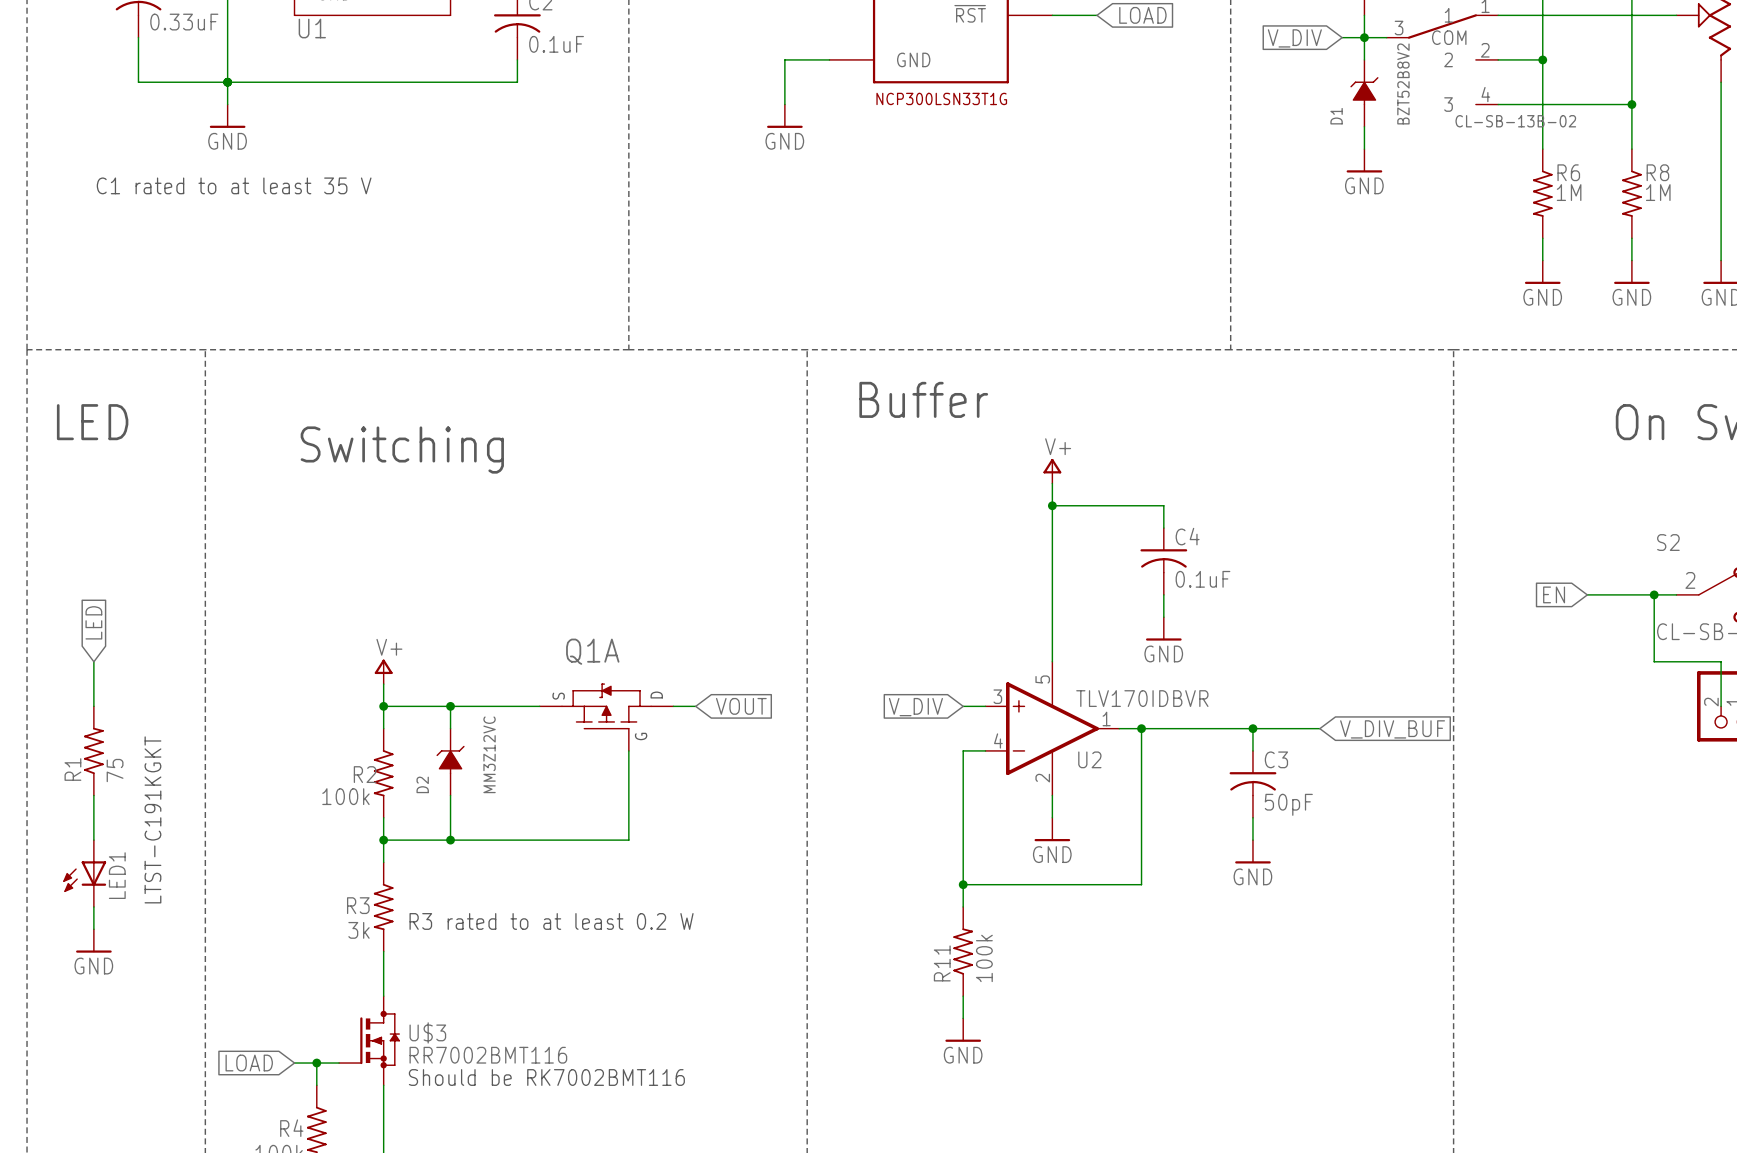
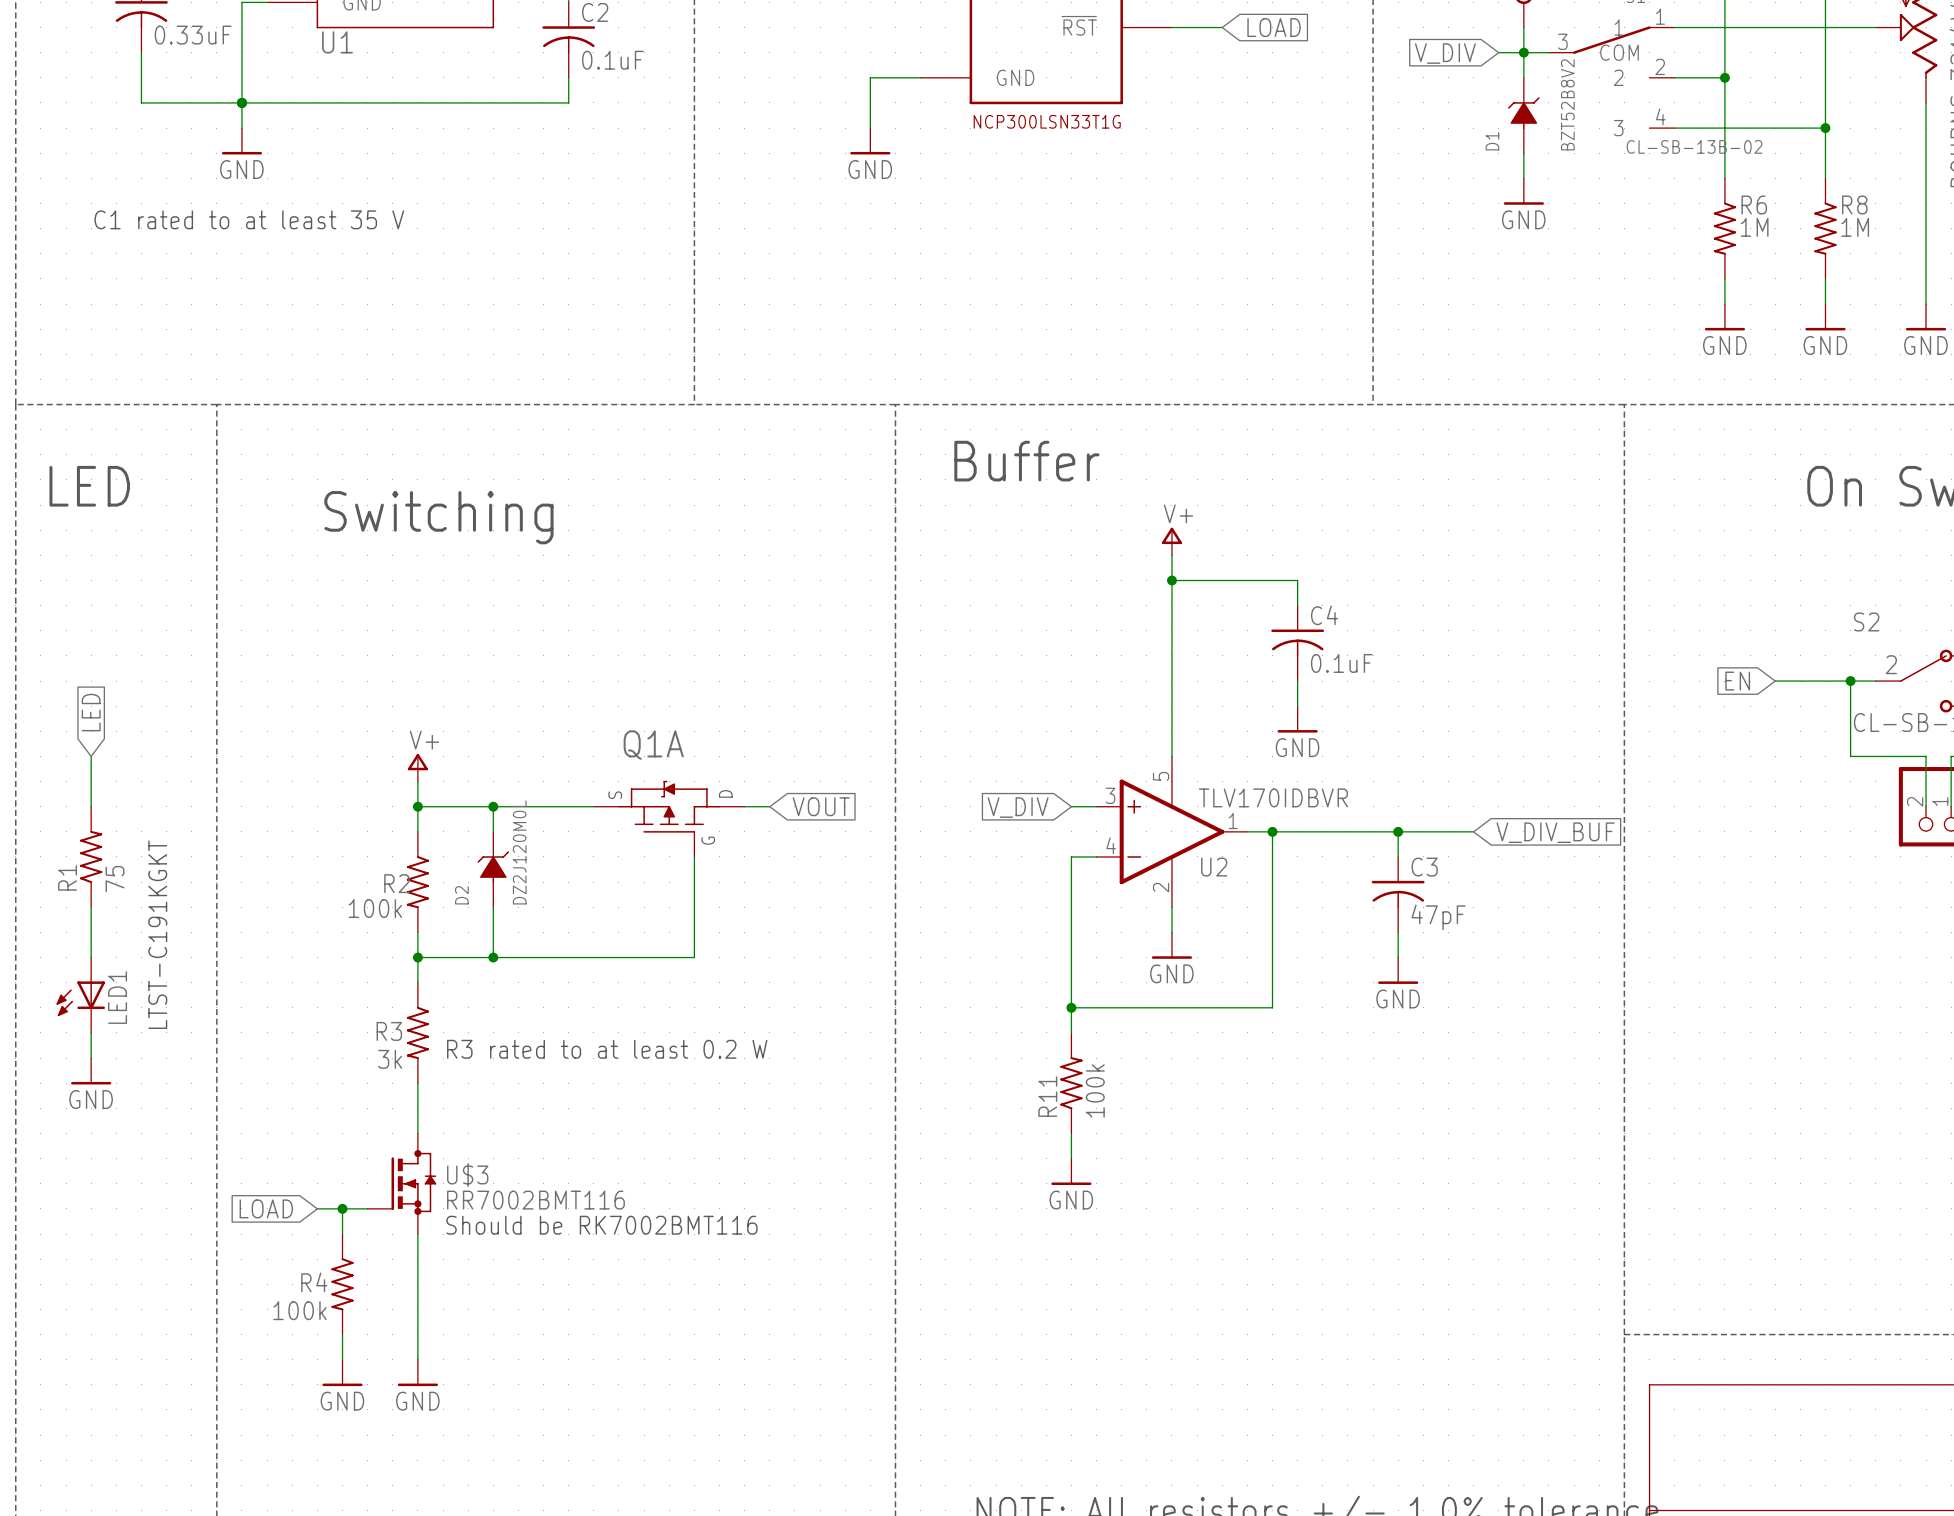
D2 value: MM3Z12VC (489, 754) -> DZ2J120M0L (519, 852)
C3 value: 50pF (1288, 804) -> 47pF (1438, 917)

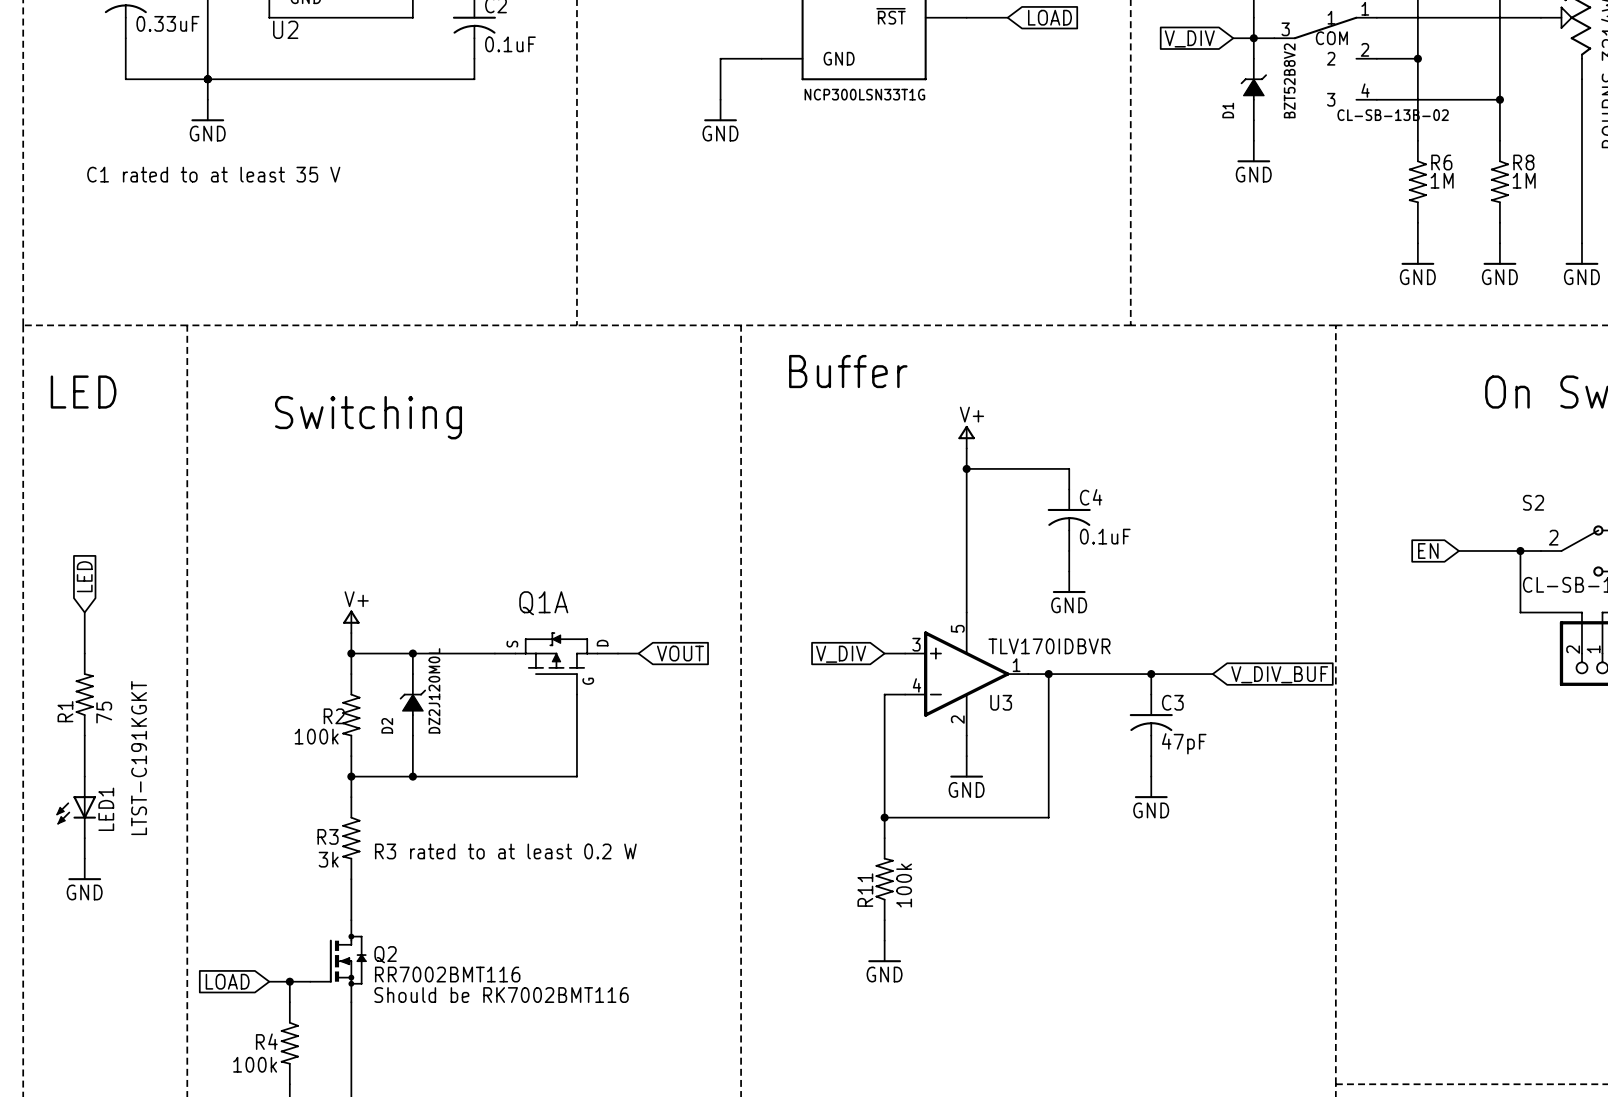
U1 name: U1 (337, 42) -> U2 (285, 29)
U2 name: U2 (1214, 867) -> U3 (1001, 702)
U$3 name: U$3 (467, 1174) -> Q2 (385, 954)

